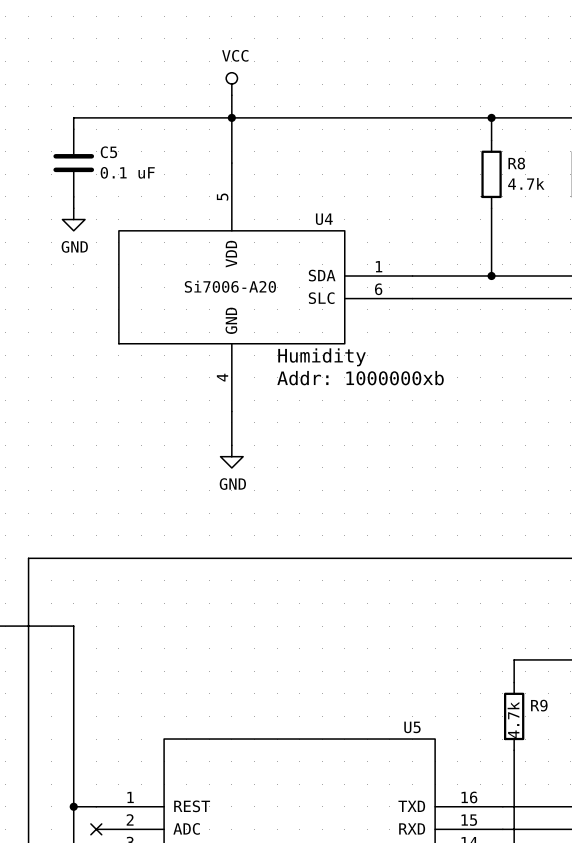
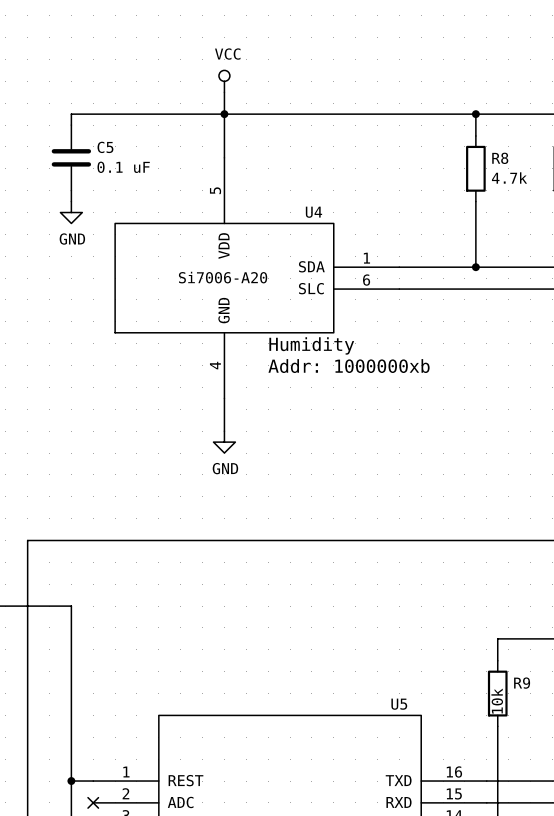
R9 value: 4.7k (513, 720) -> 10k (497, 701)

